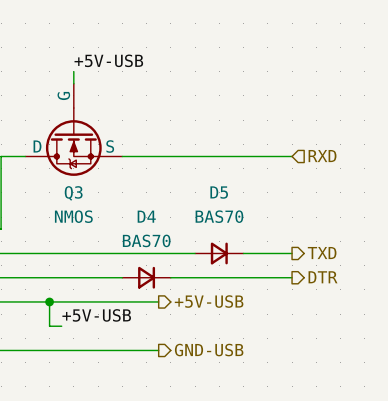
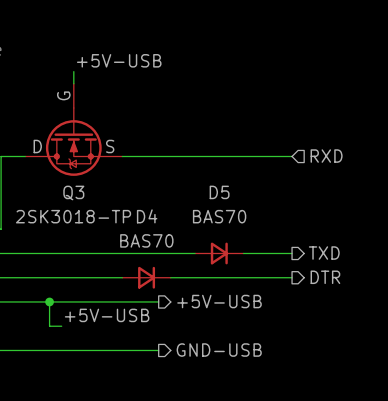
Q3 value: NMOS (73, 216) -> 2SK3018-TP (73, 216)

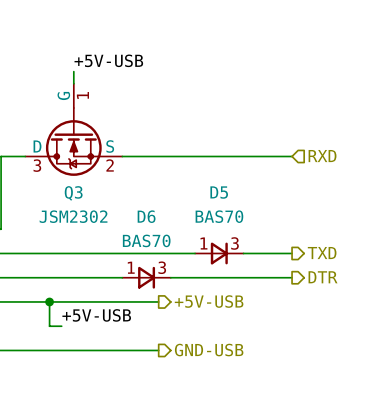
Q3 pin number: none -> 1 (82, 95)
Q3 pin number: none -> 3 (37, 165)
Q3 pin number: none -> 2 (110, 165)
Q3 value: 2SK3018-TP (73, 216) -> JSM2302 (73, 216)
D4 name: D4 (147, 216) -> D6 (146, 216)
D5 pin number: none -> 1 (203, 243)
D5 pin number: none -> 3 (234, 243)
D4 pin number: none -> 1 (131, 267)
D4 pin number: none -> 3 (162, 267)

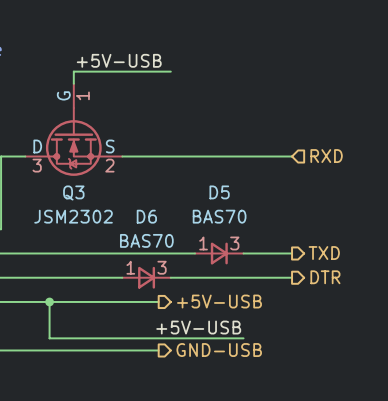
wire: none -> (73, 71) (170, 71)
label position: +5V-USB (96, 315) -> +5V-USB (198, 327)
wire: (49, 326) (61, 326) -> (49, 326) (49, 338) (243, 338)

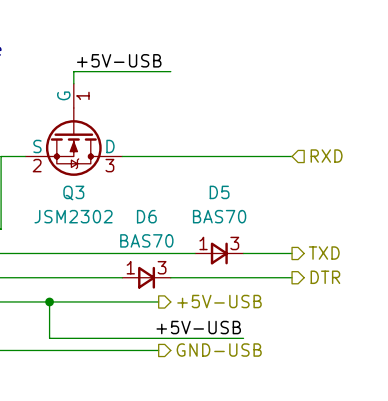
Q3 flip: as is (73, 141) -> left-right (73, 141)

